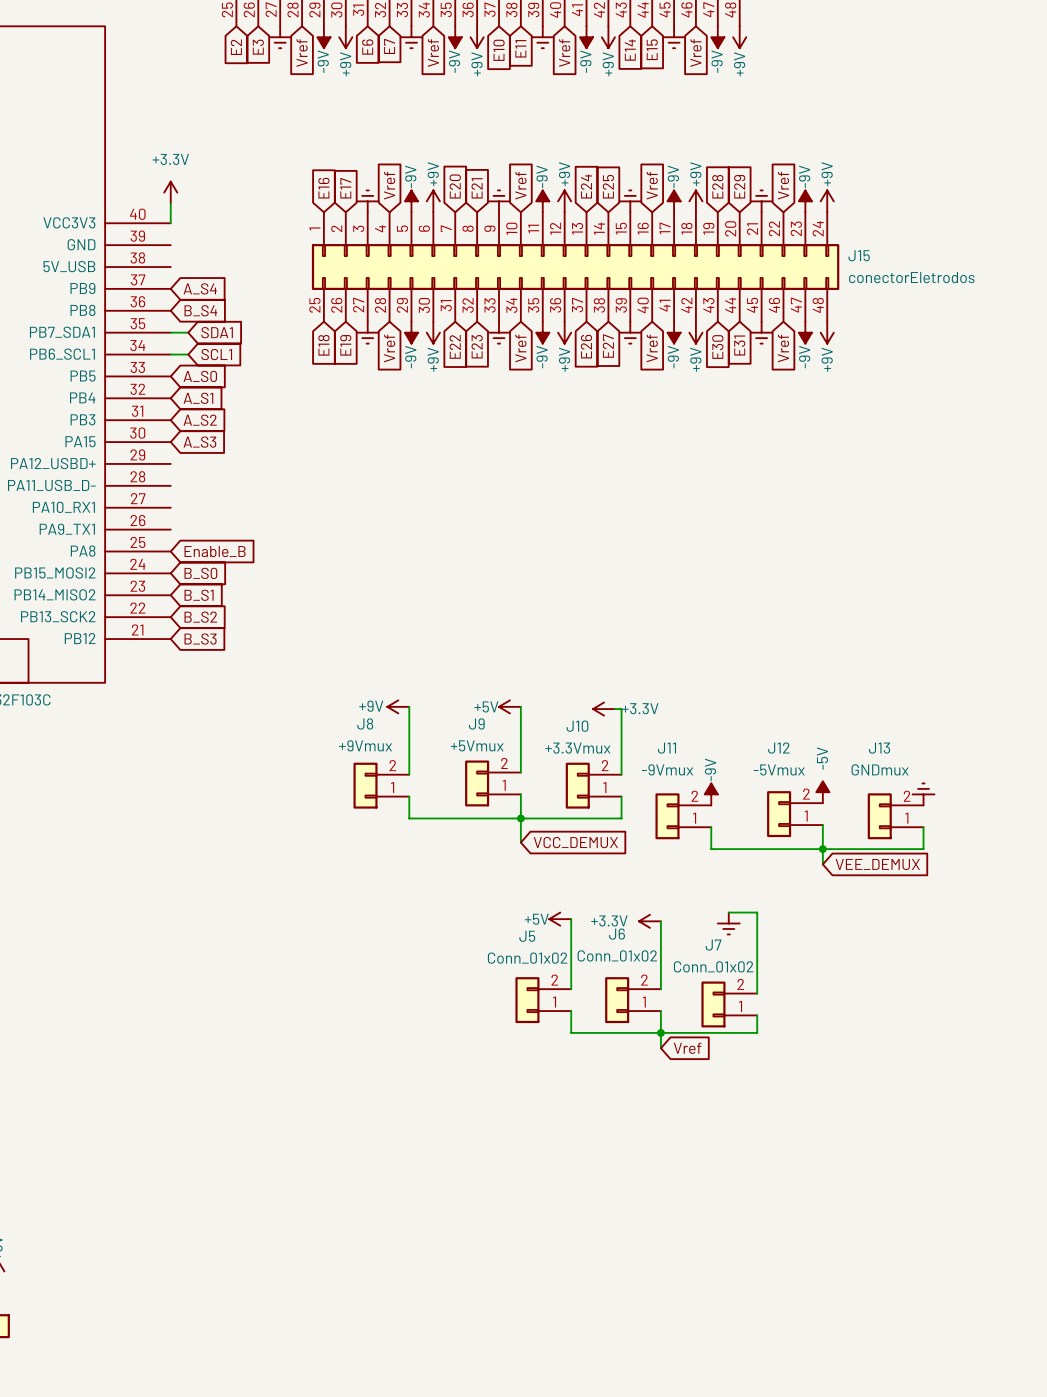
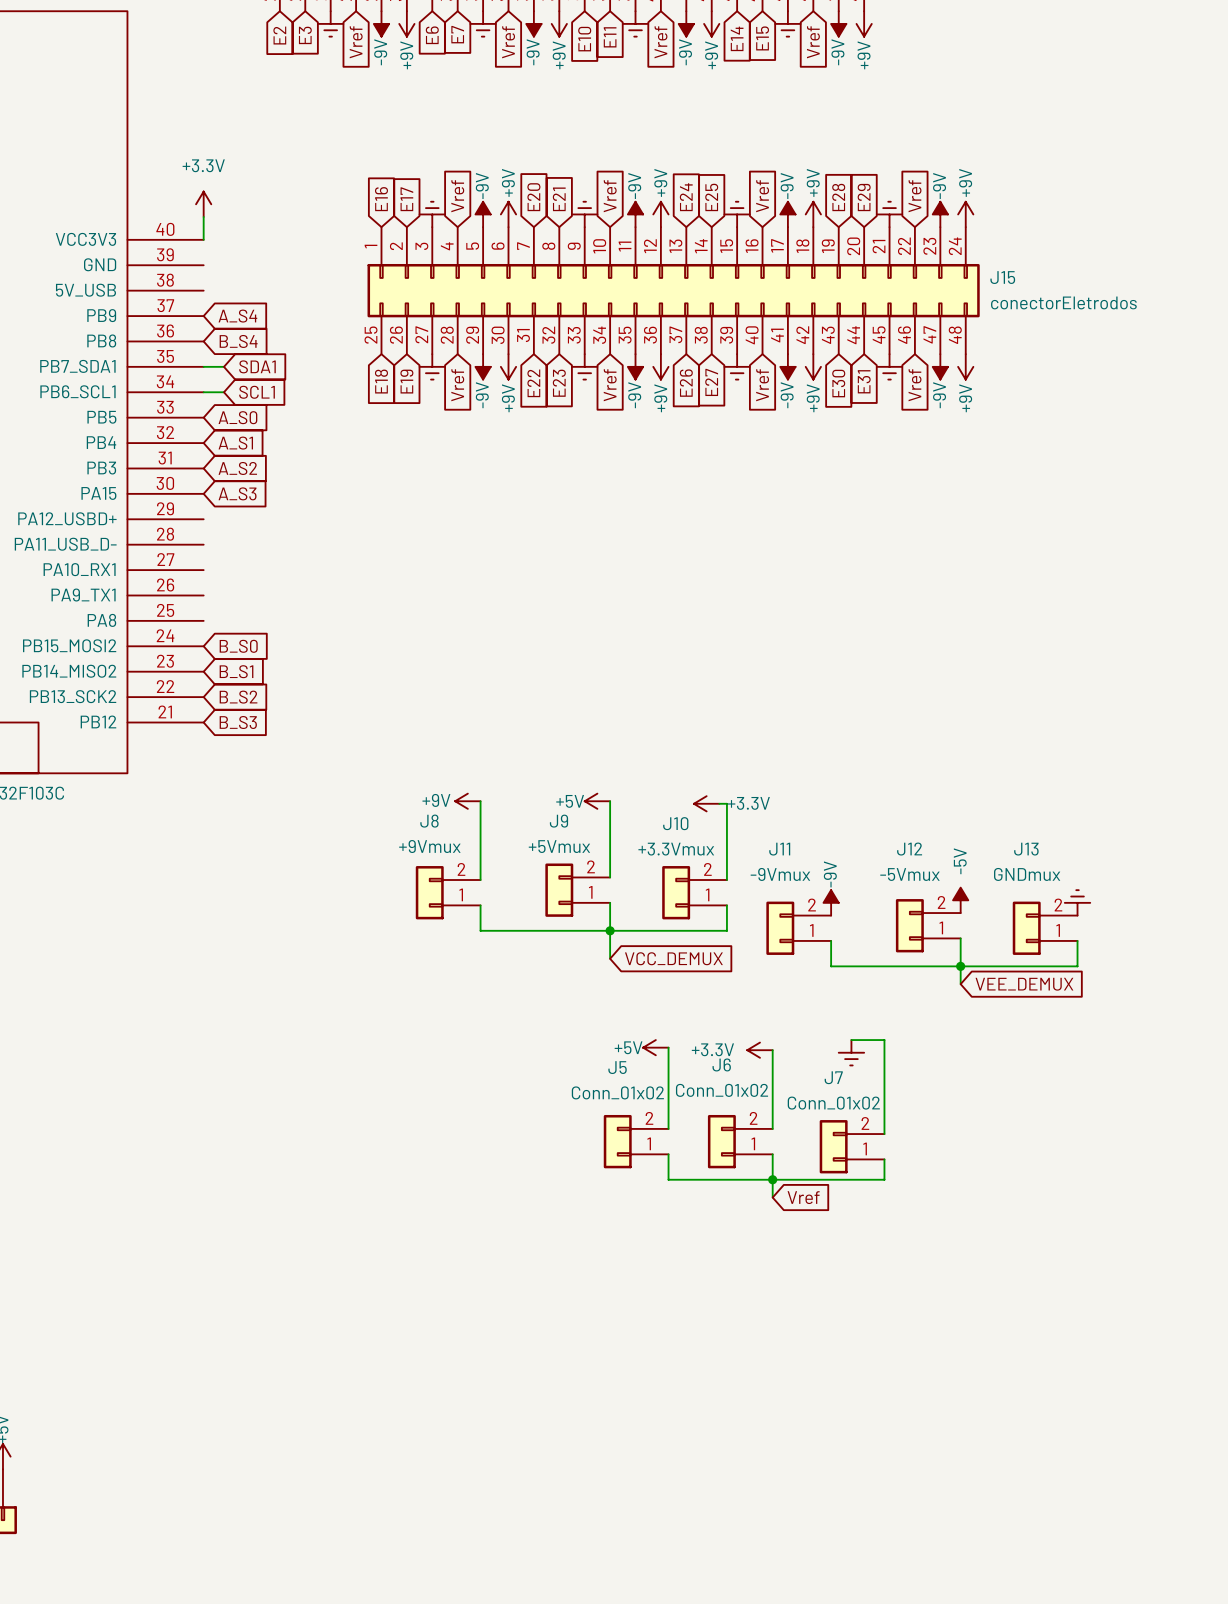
global label: Enable_B (215, 551) -> none

